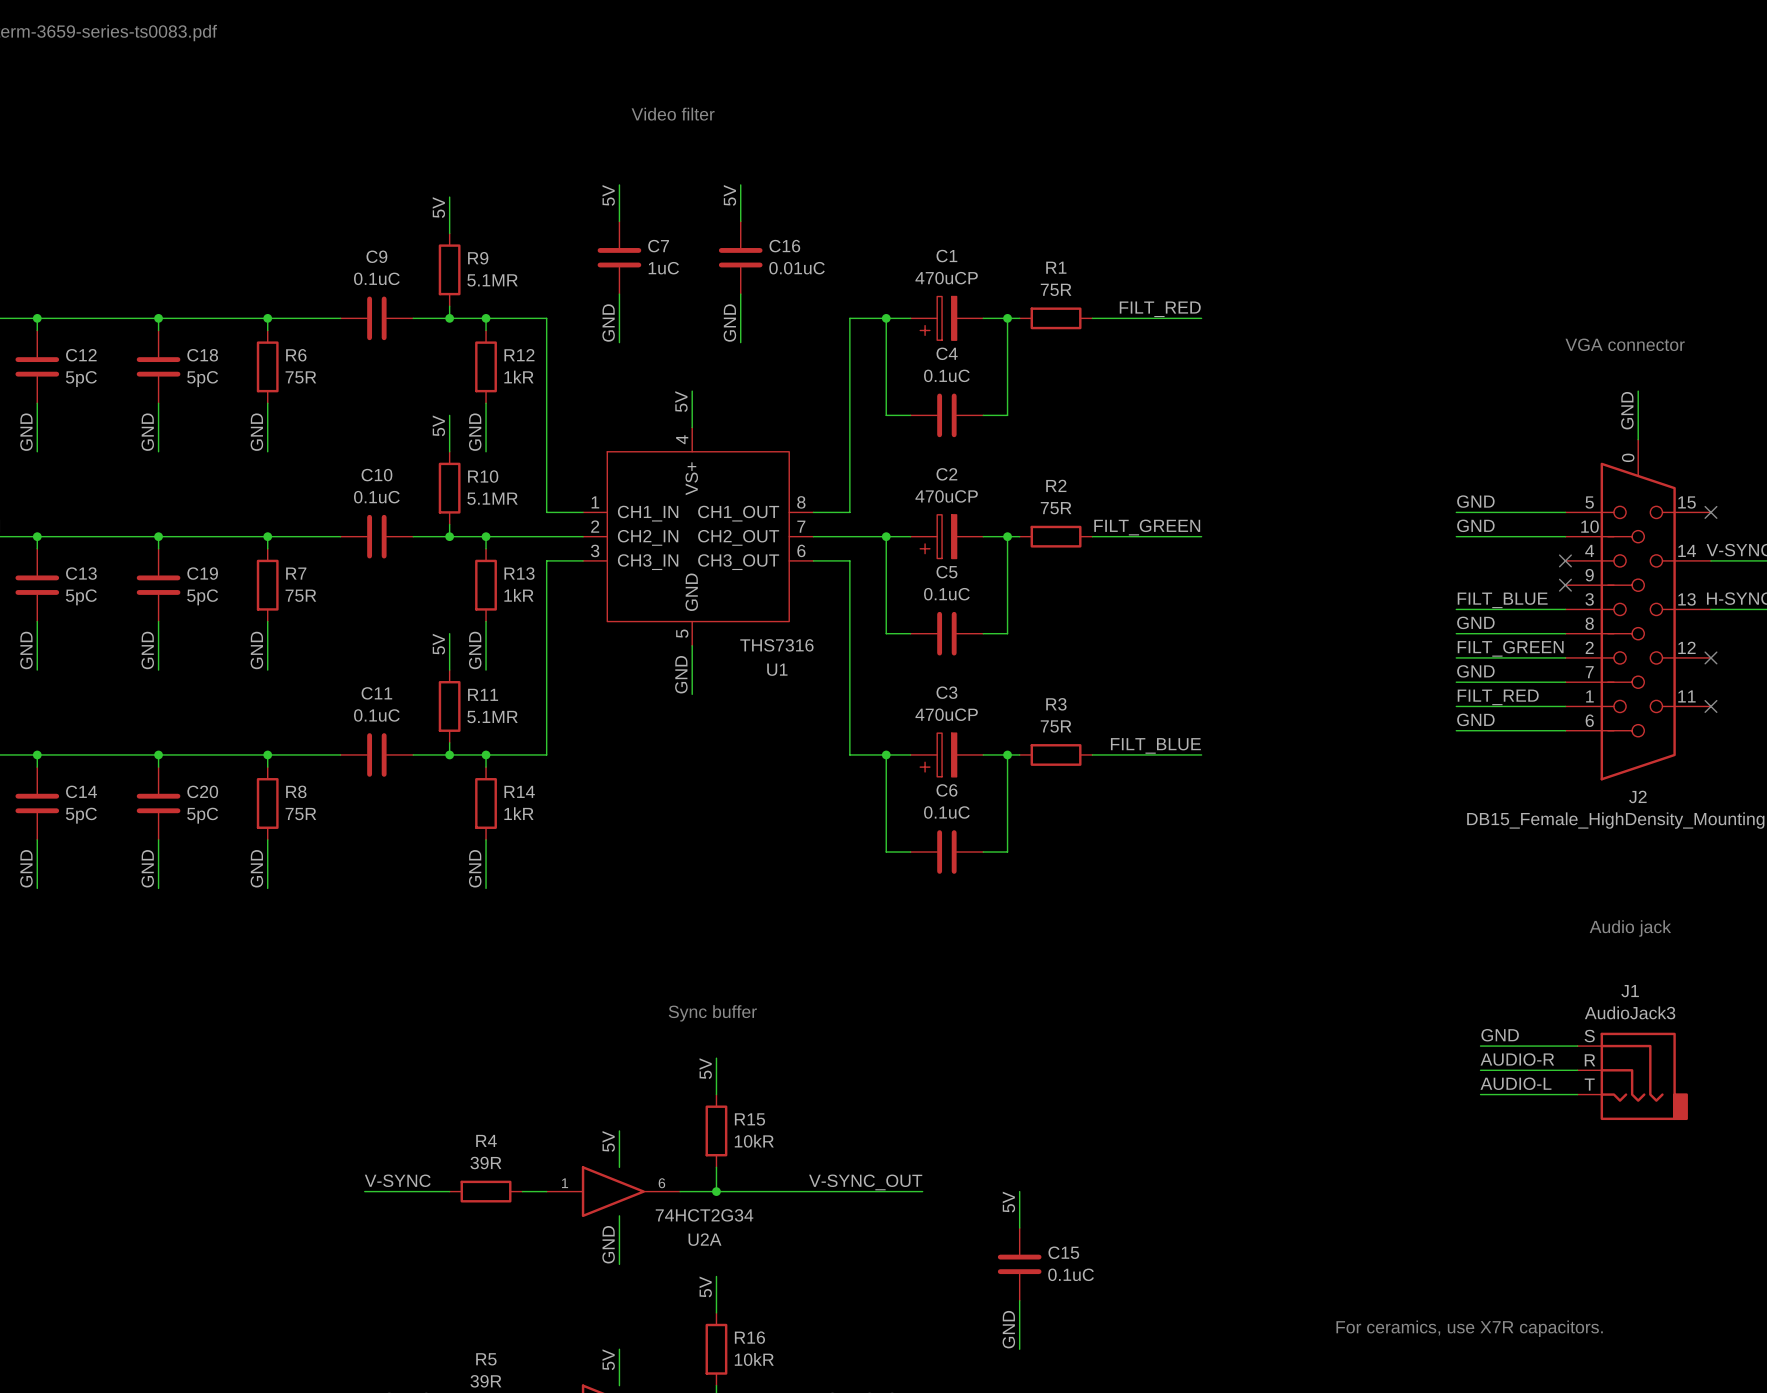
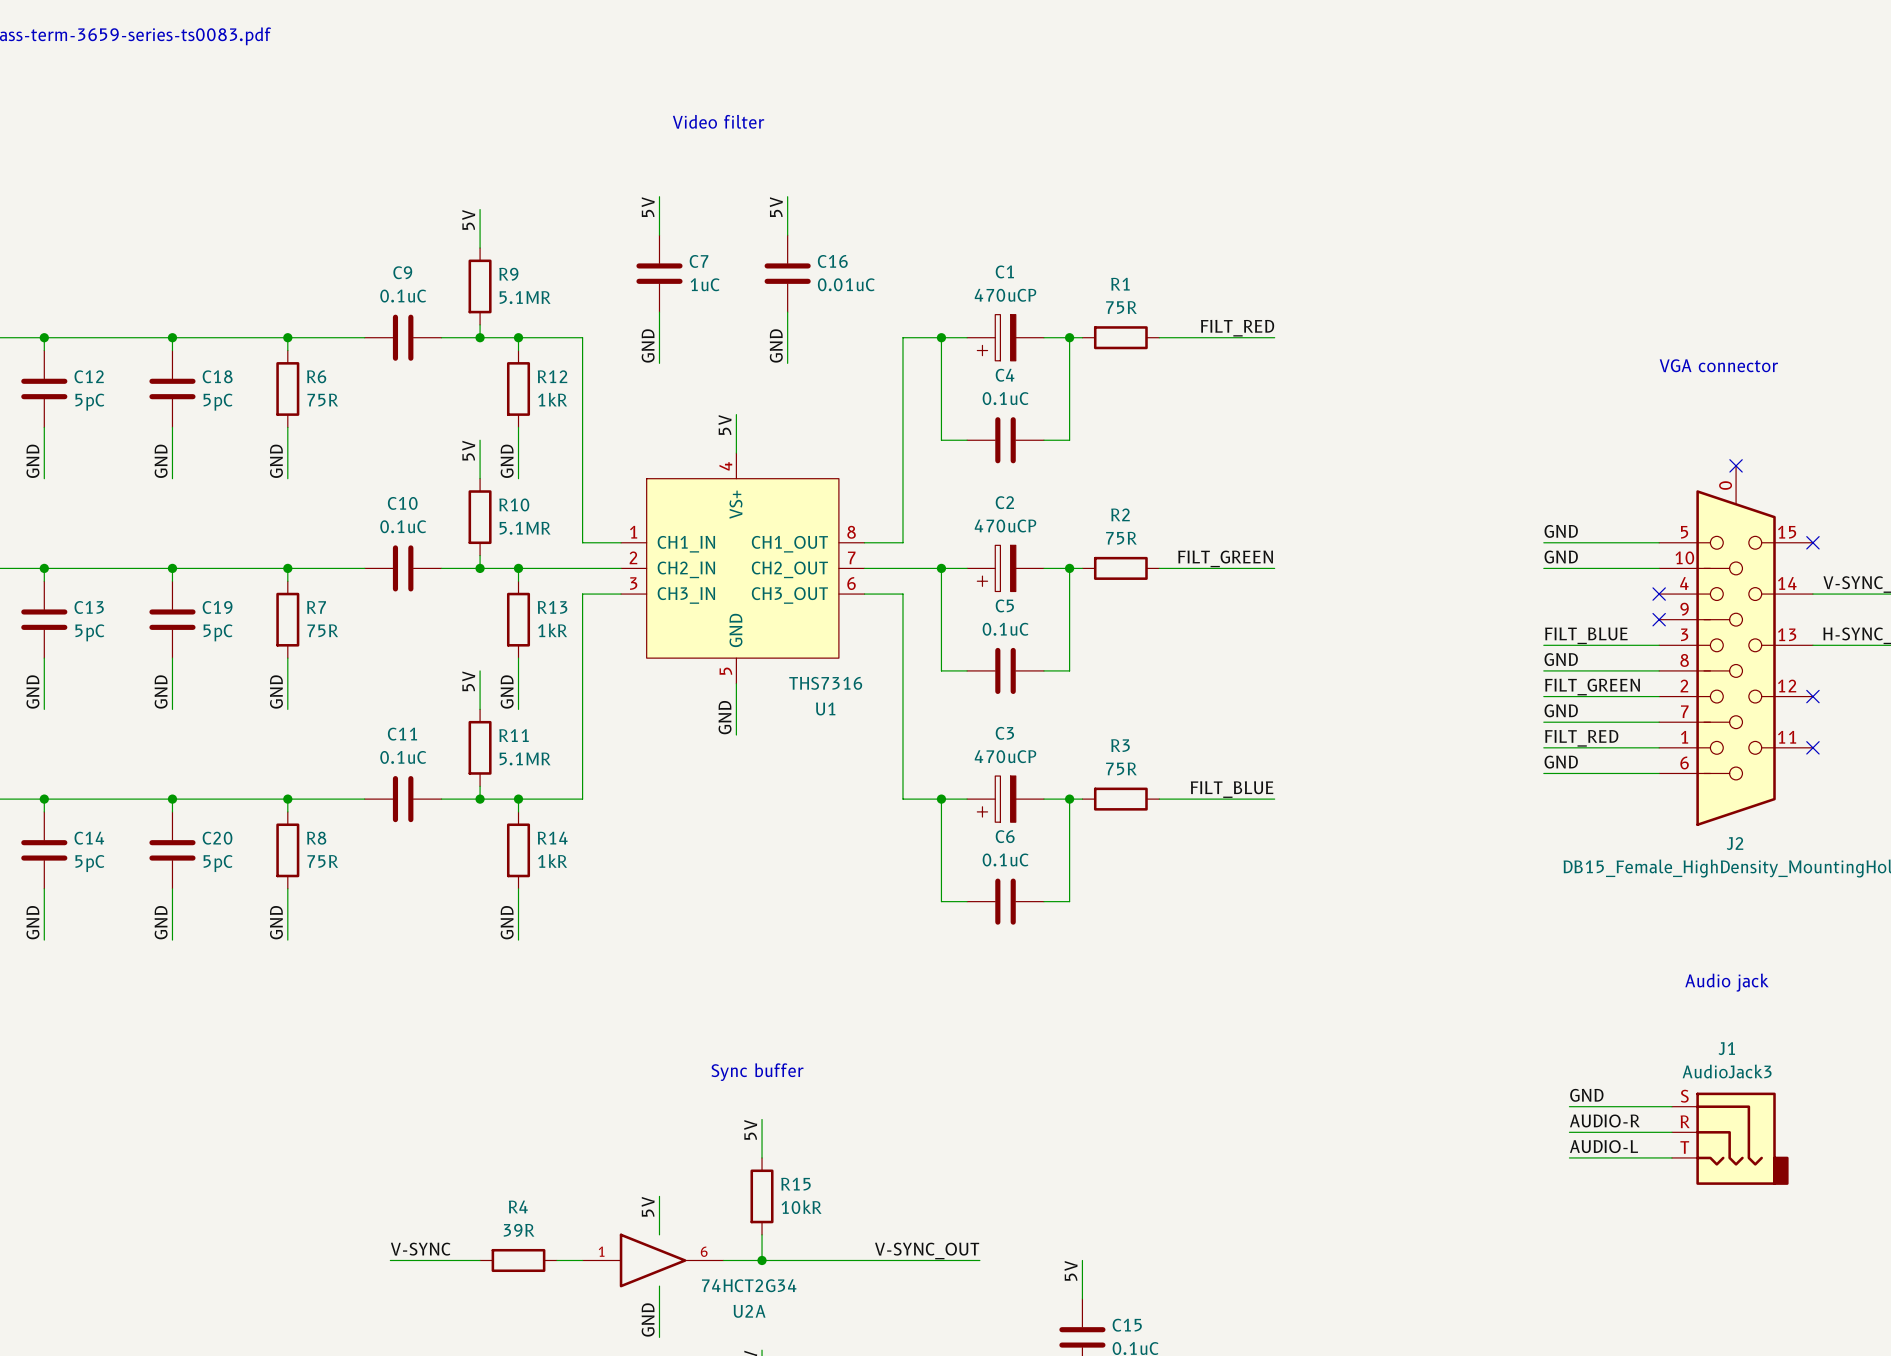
wire: (1638, 391) (1638, 439) -> none
label: GND (1627, 410) -> none
no-connect mark: none -> (1736, 465)

